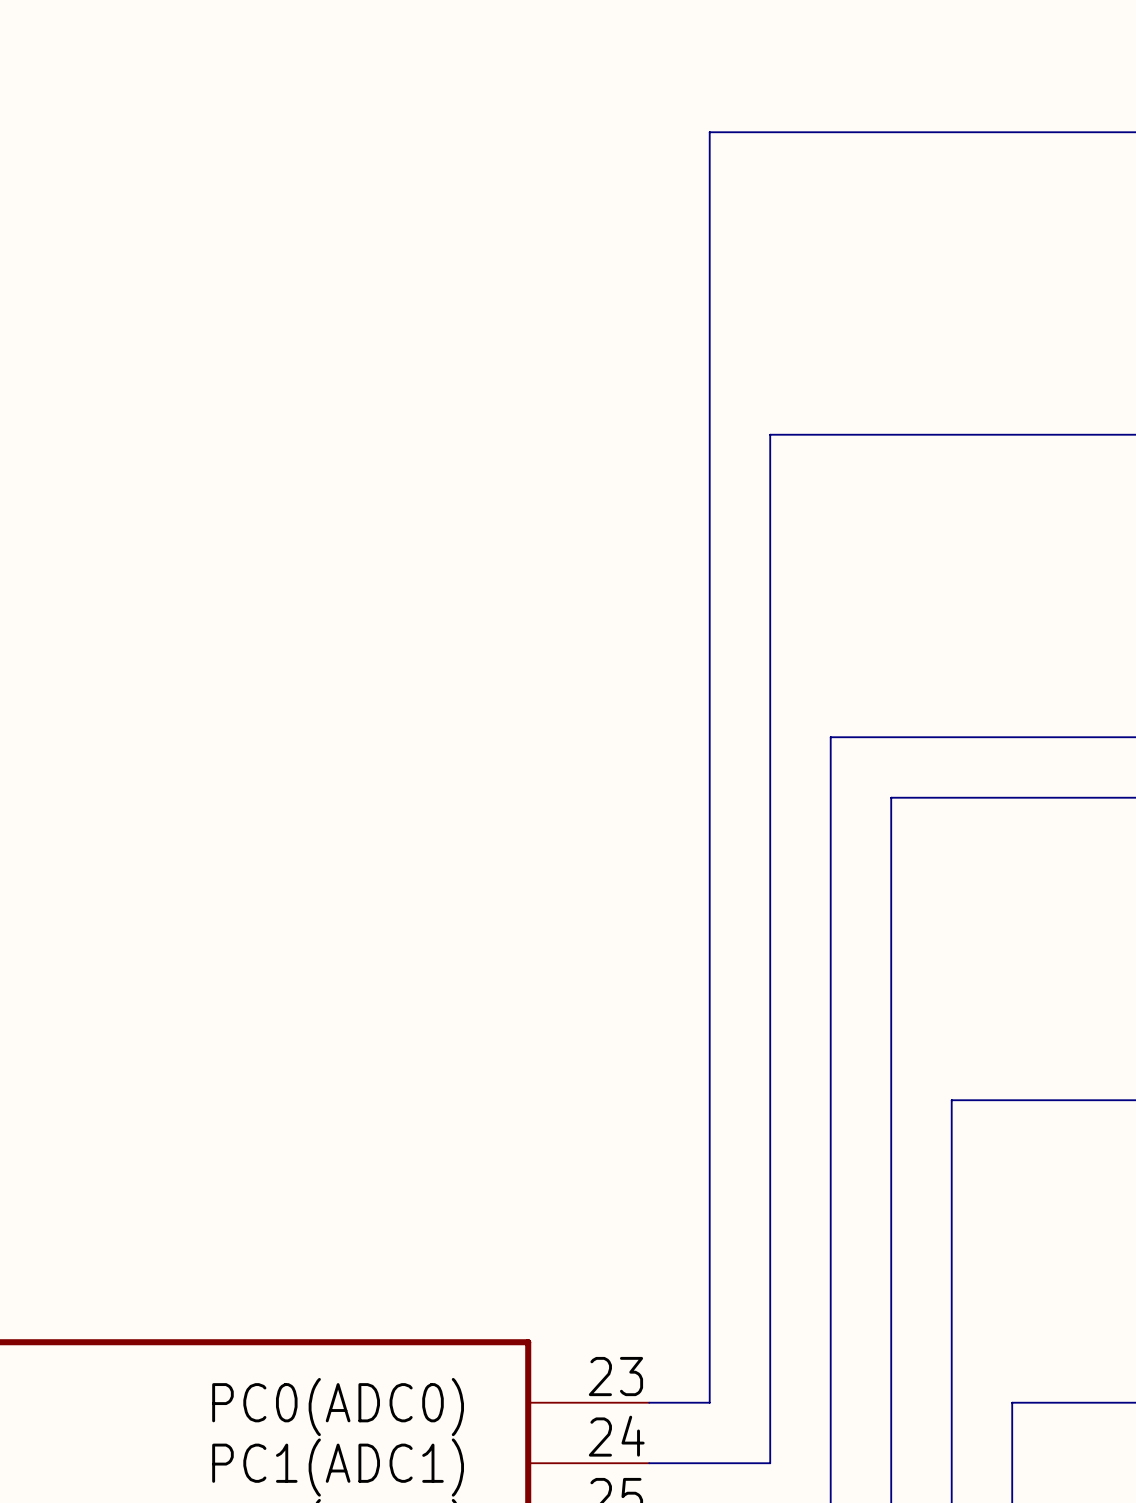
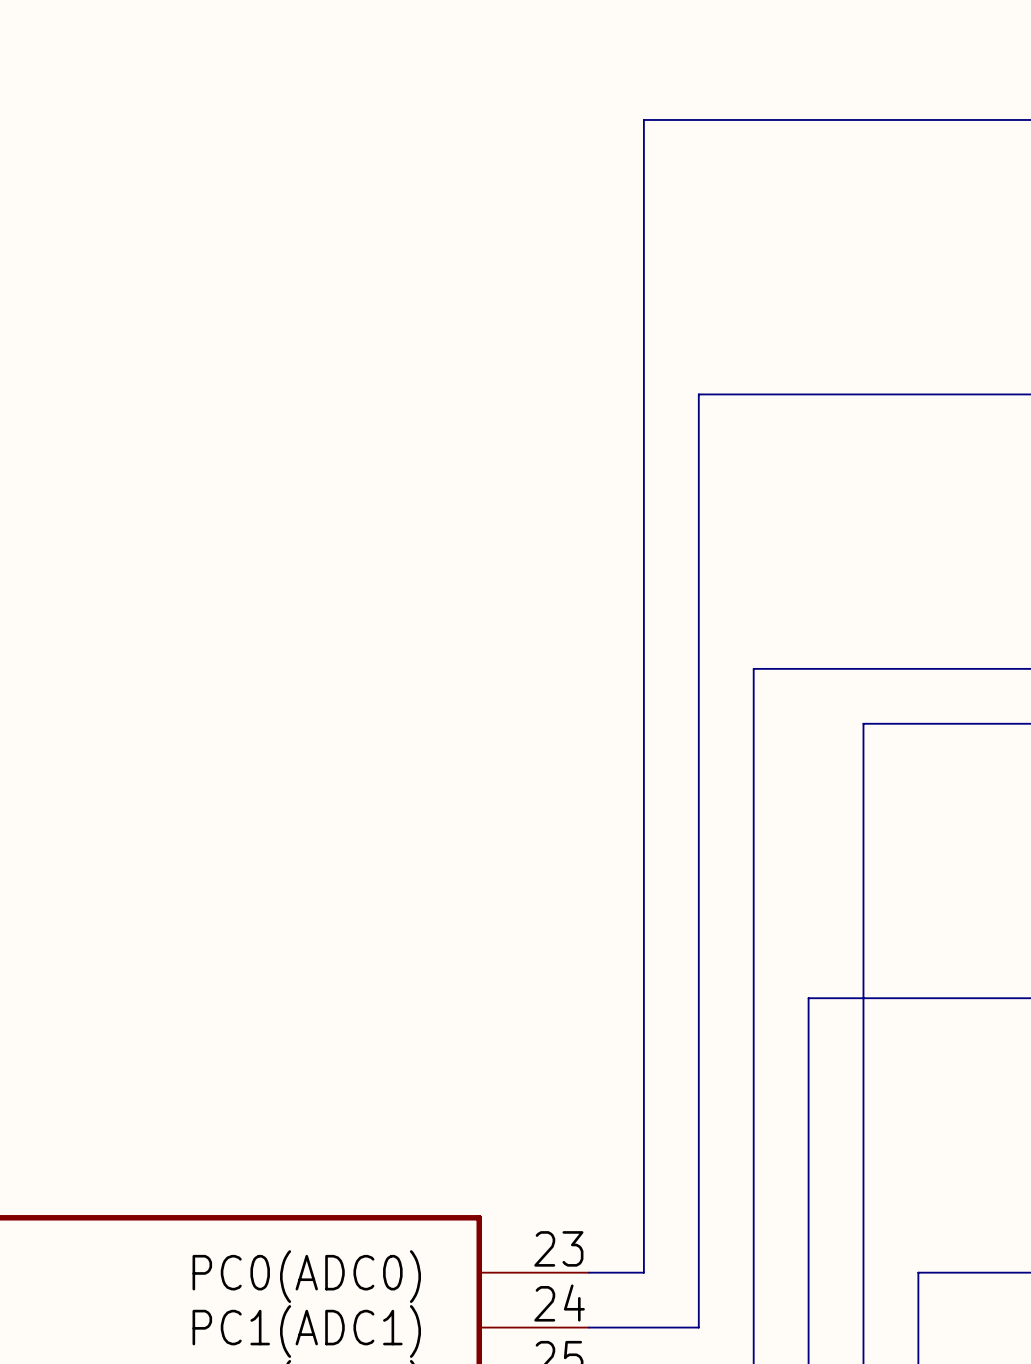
wire: (951, 797) (891, 797) (891, 1100) -> (863, 723) (863, 998) (808, 998)

